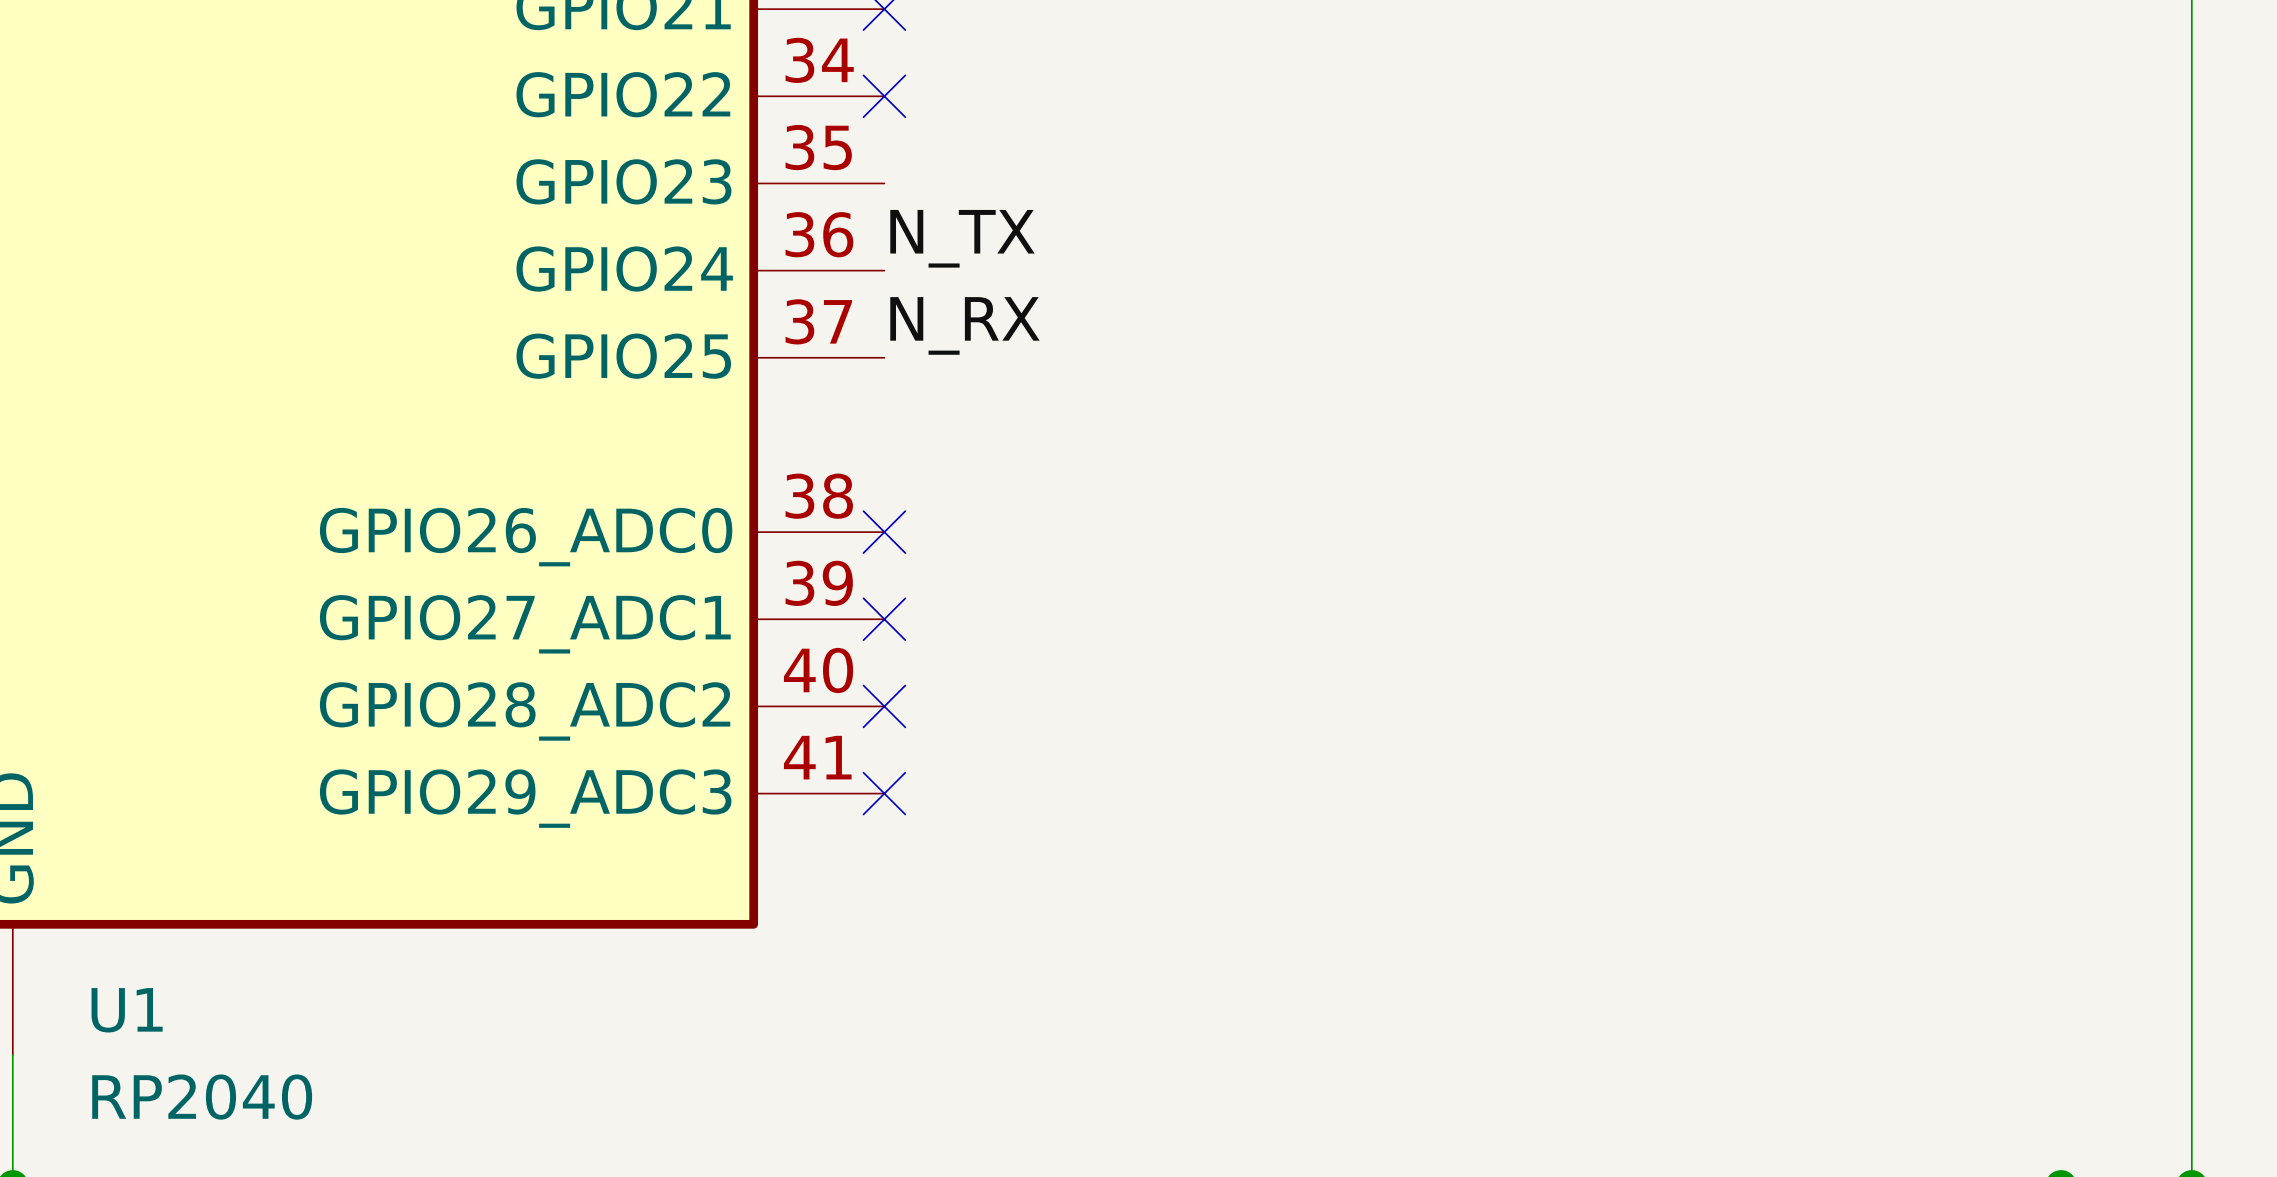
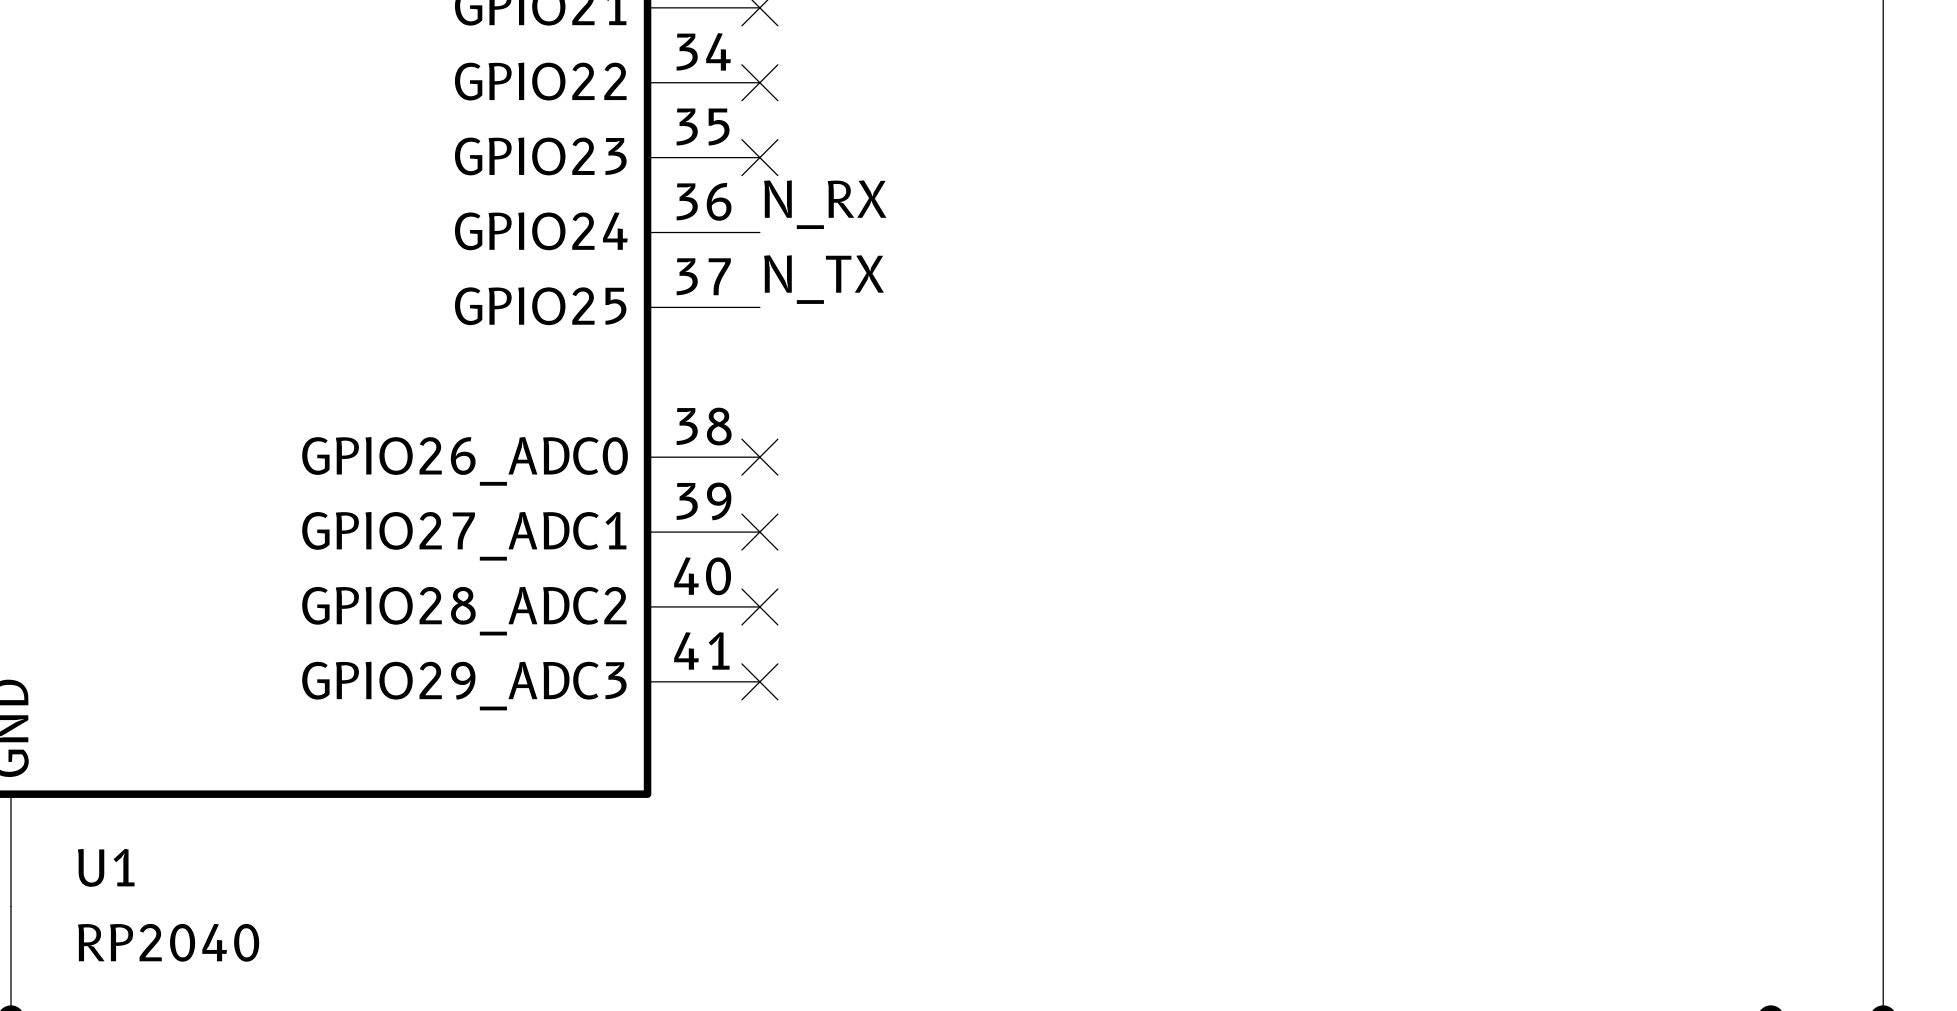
no-connect mark: none -> (759, 157)
label: N_TX (962, 238) -> N_RX (825, 204)
label: N_RX (964, 325) -> N_TX (823, 279)

